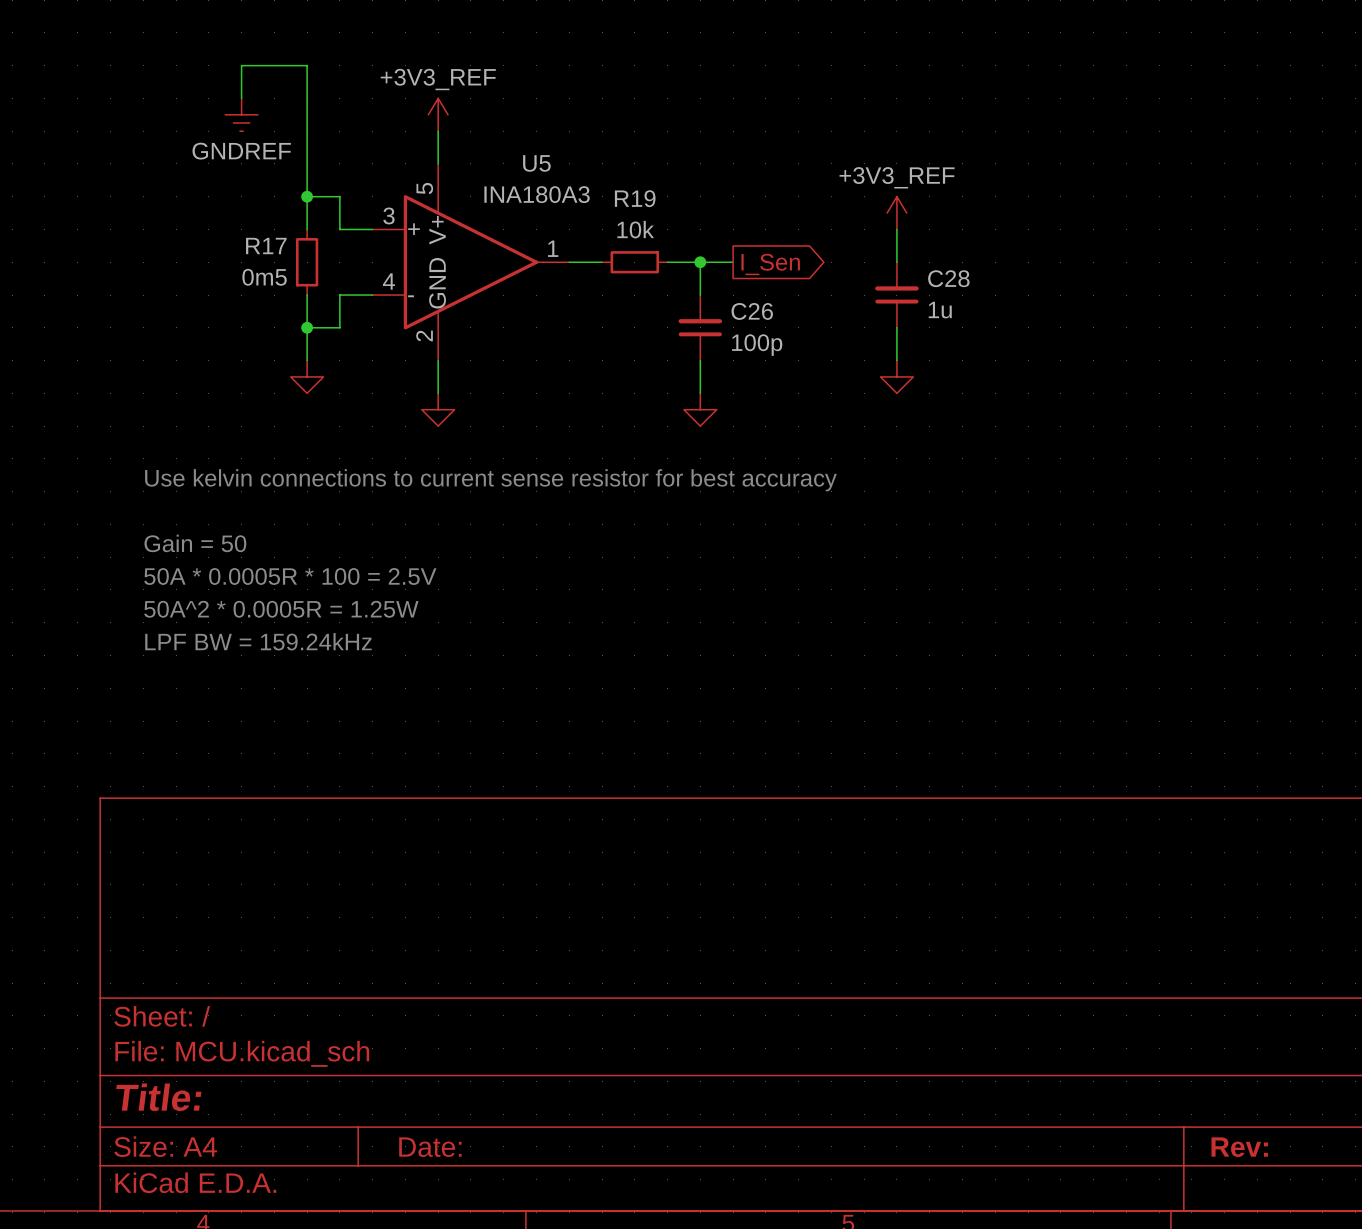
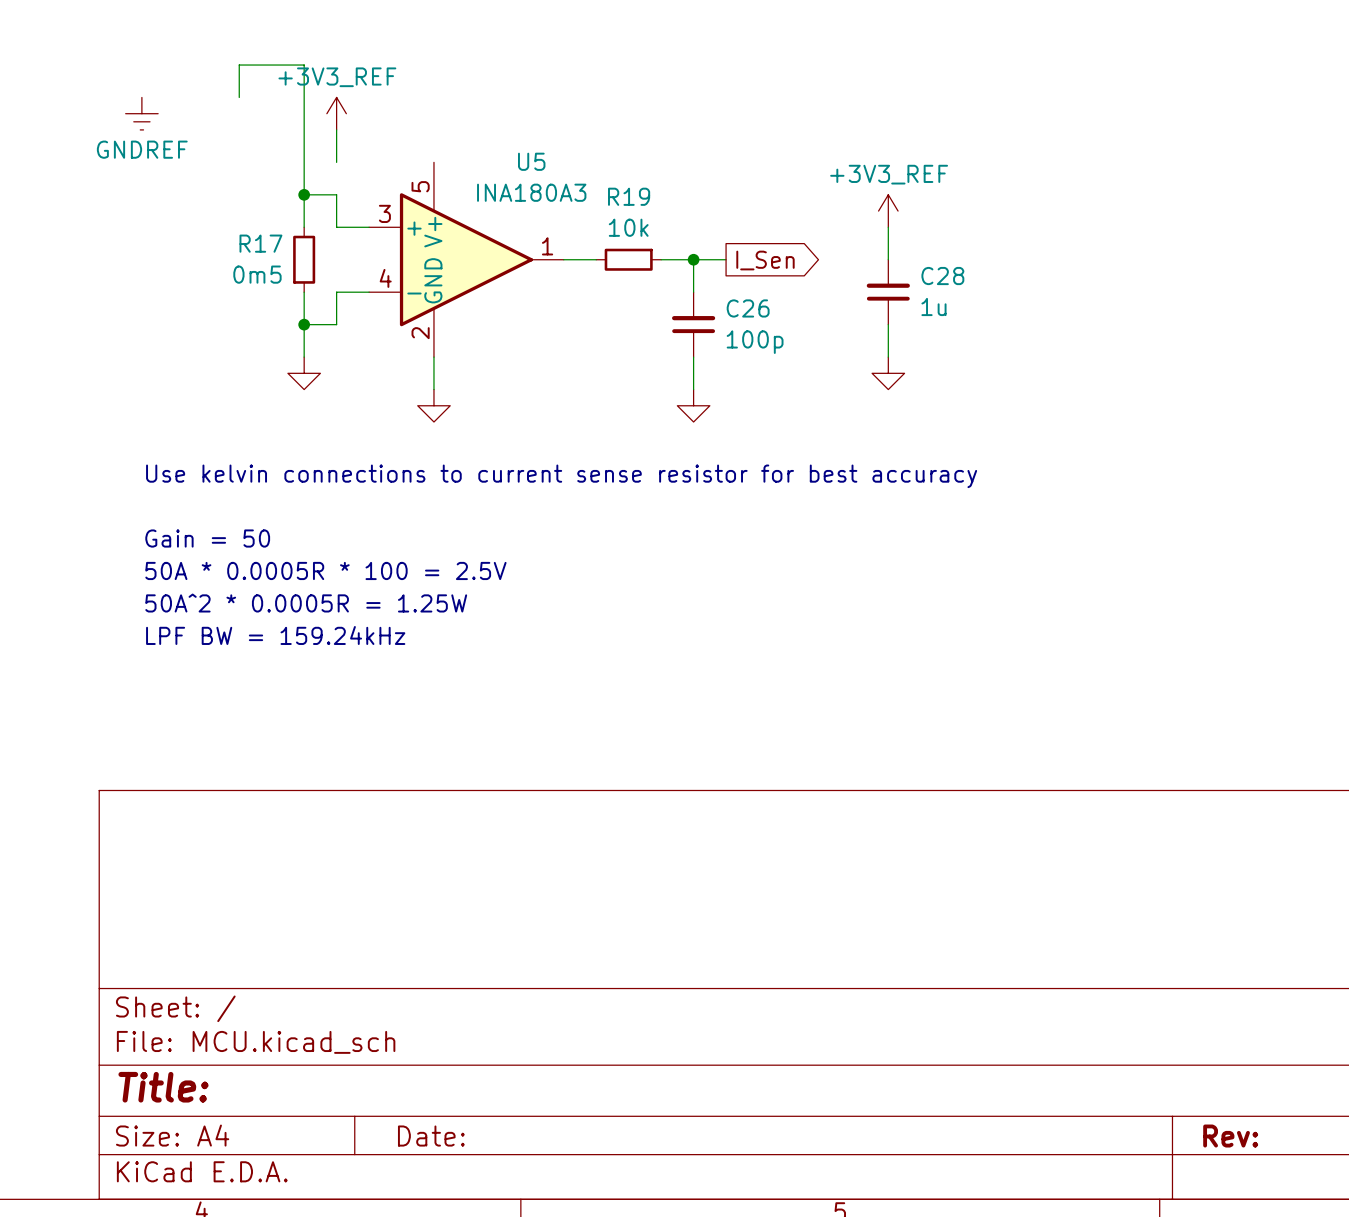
power symbol position: GNDREF (241, 114) -> GNDREF (141, 113)
power symbol position: +3V3_REF (438, 114) -> +3V3_REF (336, 113)
wire: (438, 131) (438, 163) -> (336, 129) (336, 162)

